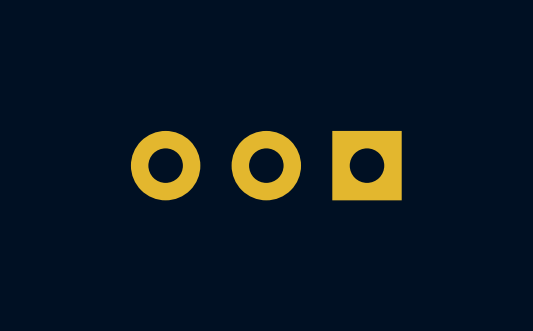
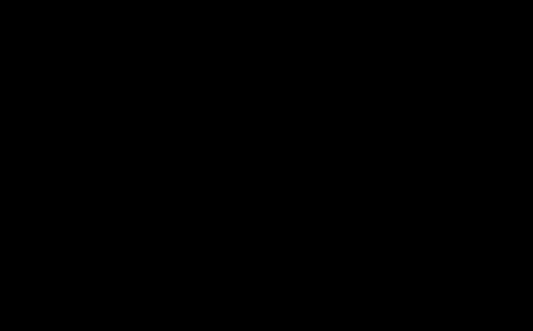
part: (266, 165) -> none

